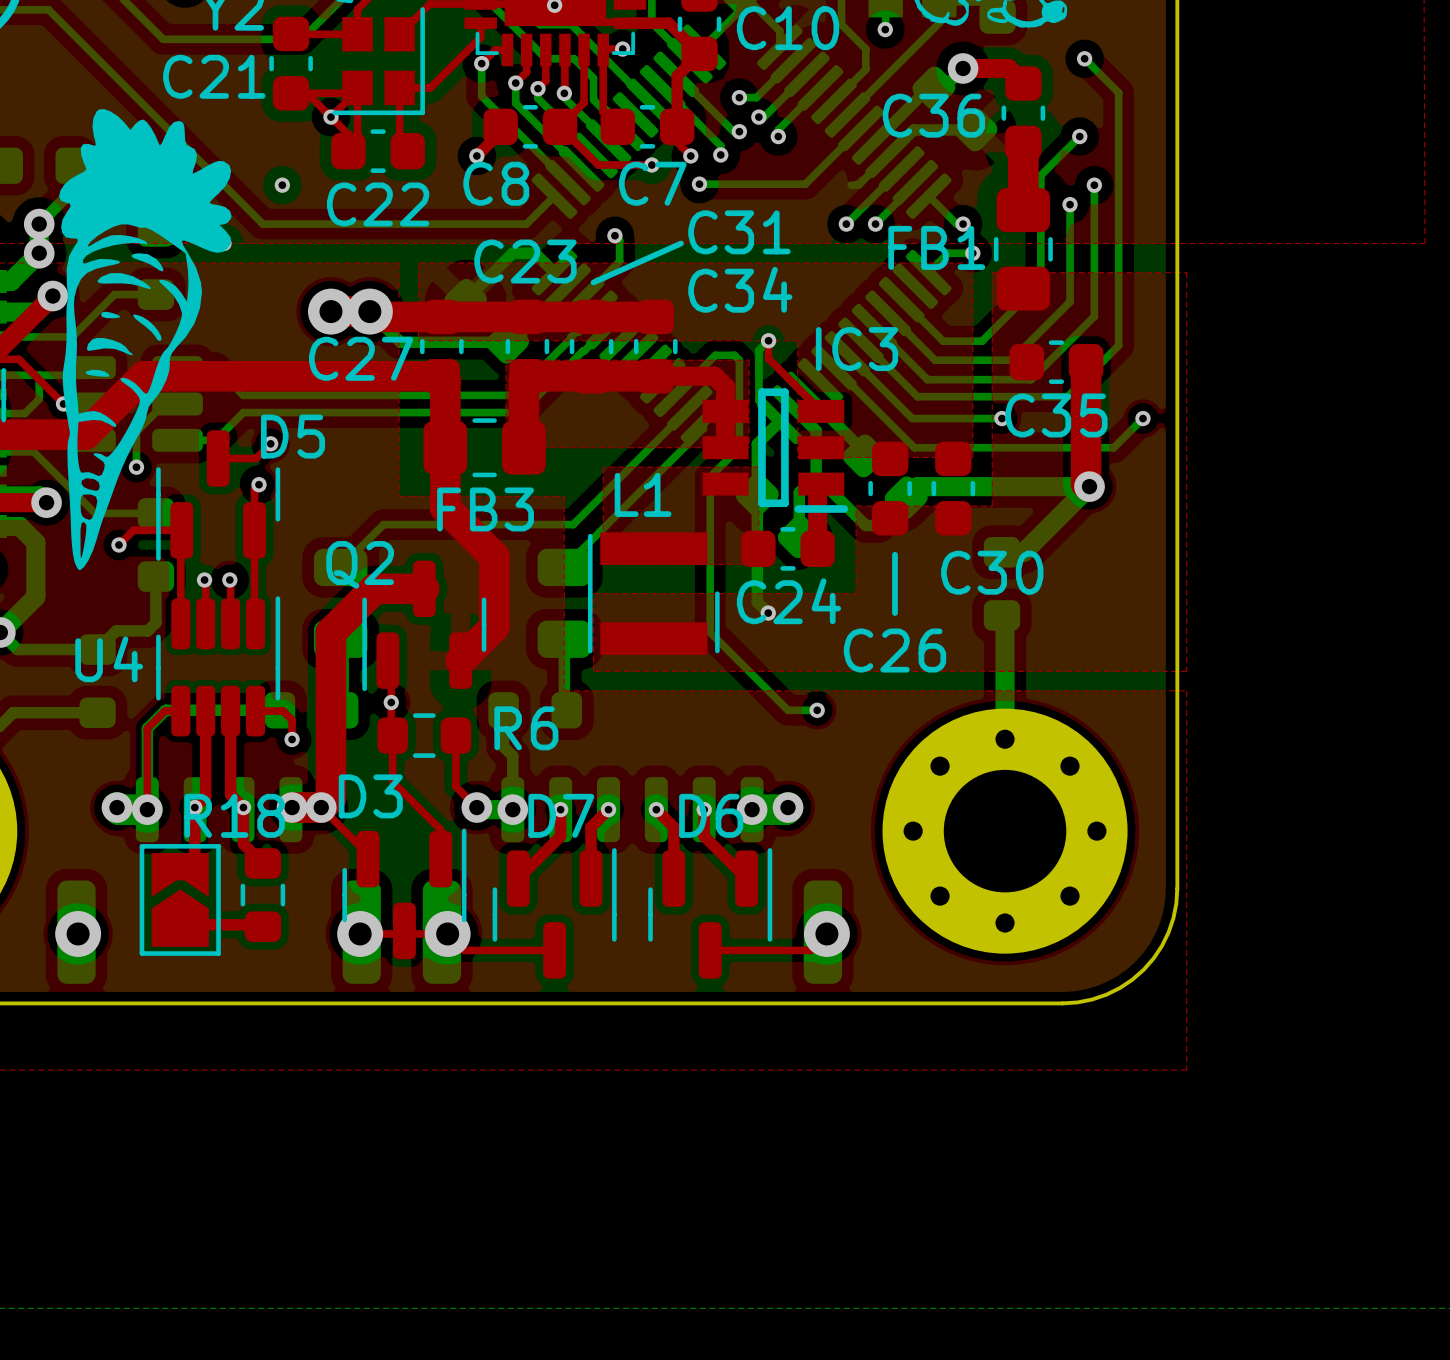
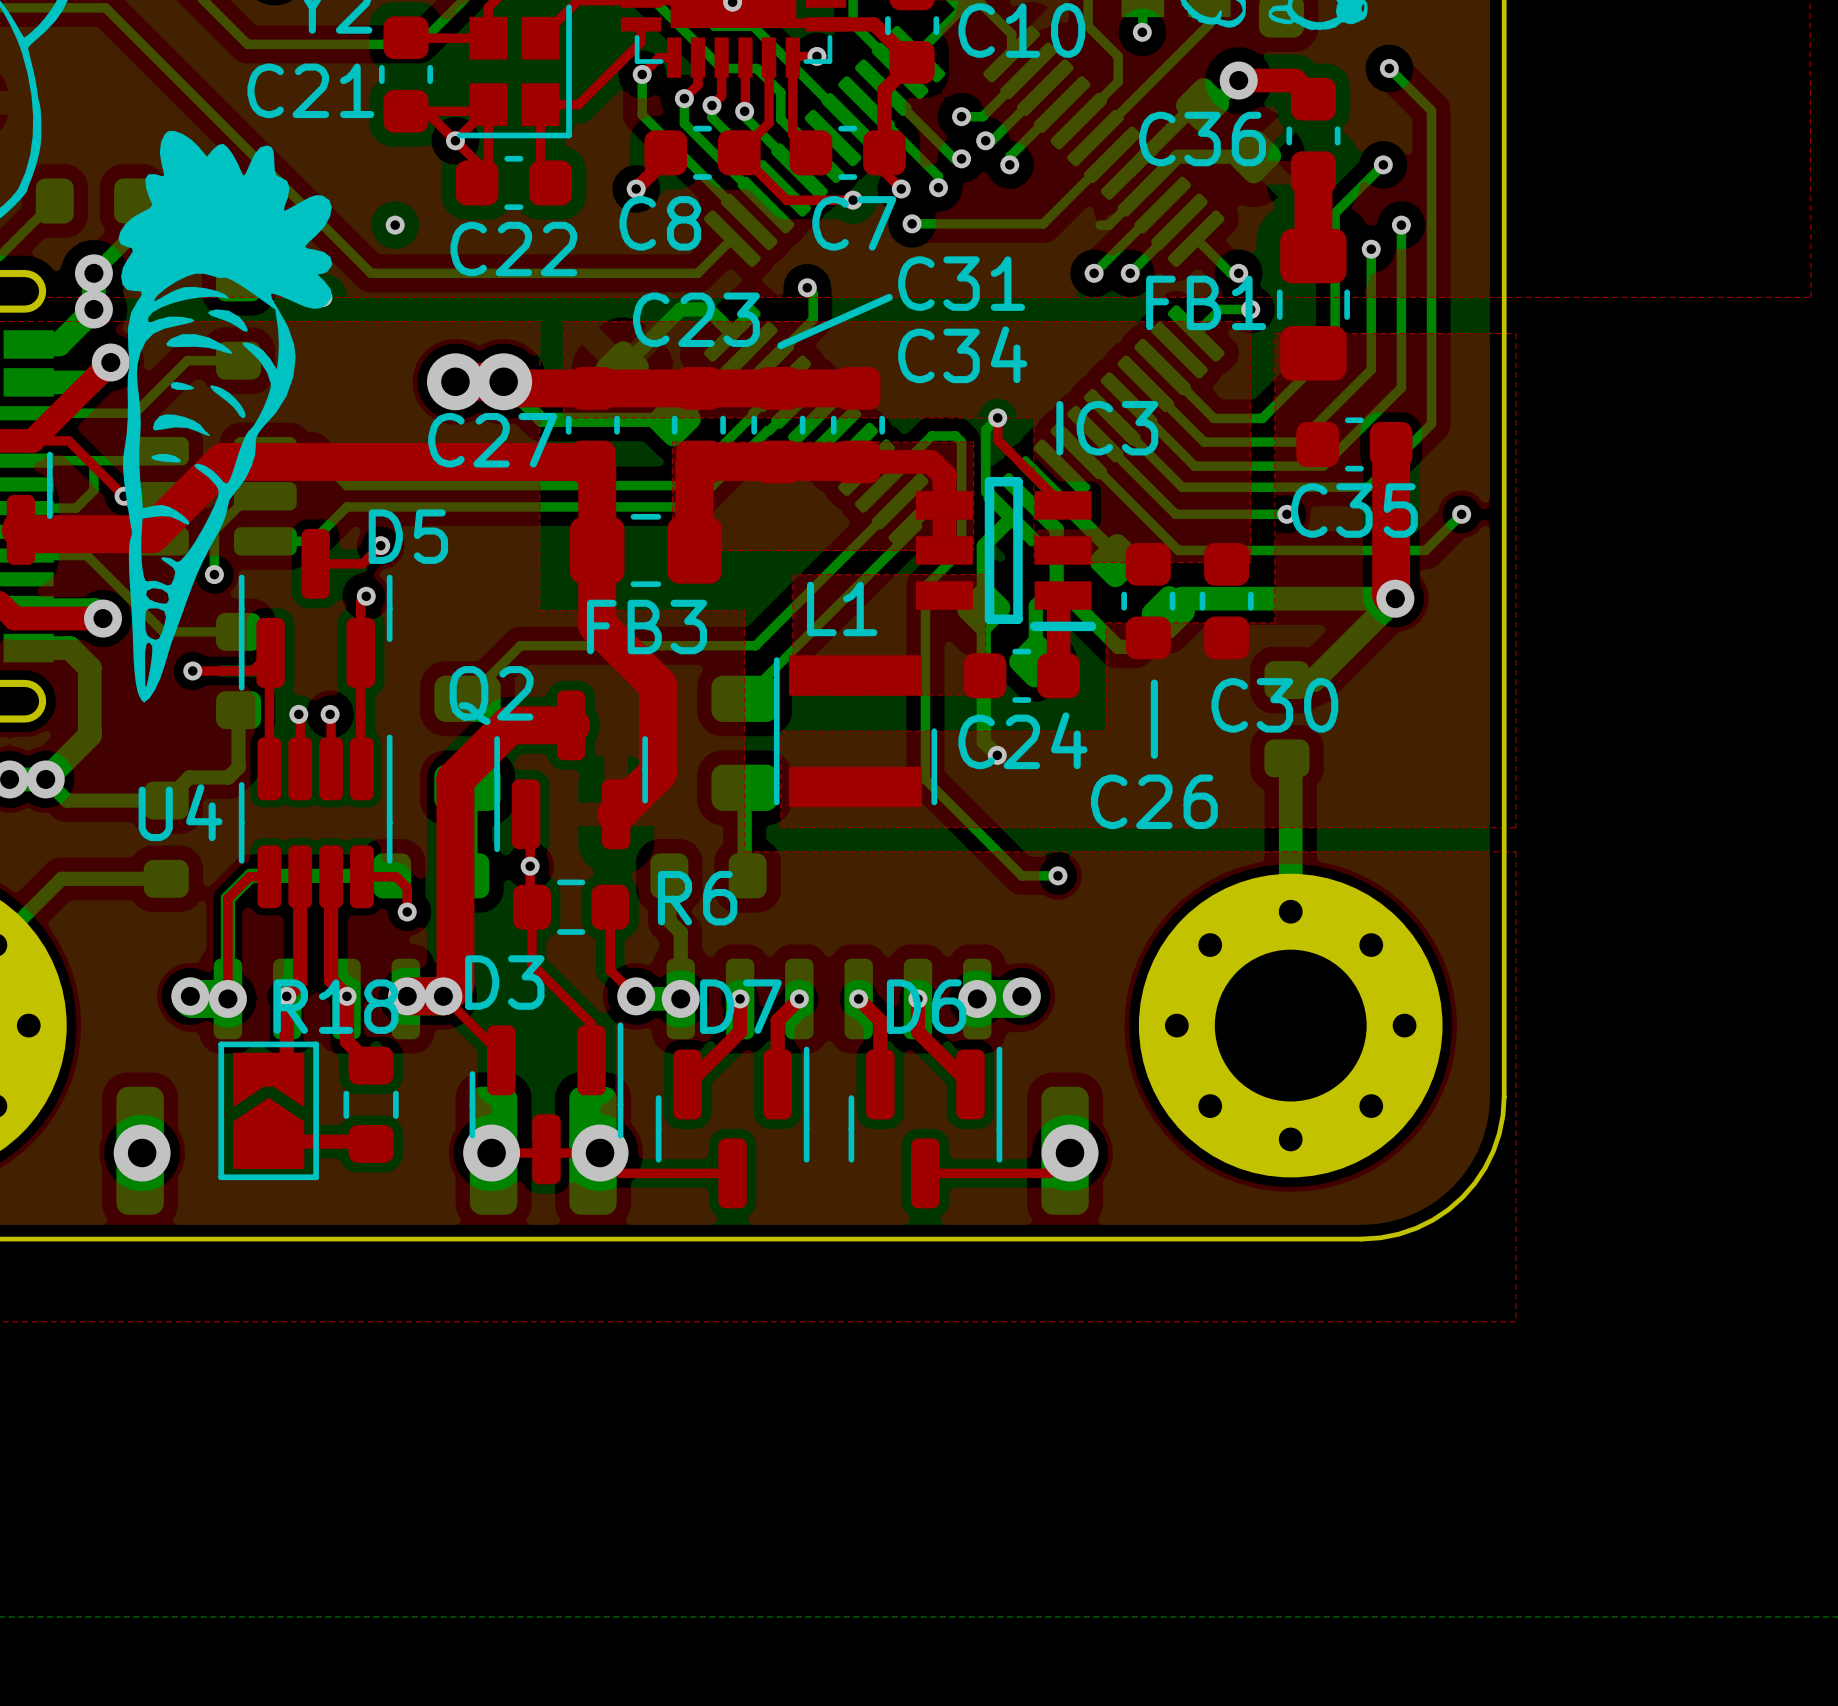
top track: (181, 530) (133, 530) (118, 544) -> (269, 653) (252, 670) (192, 670)

